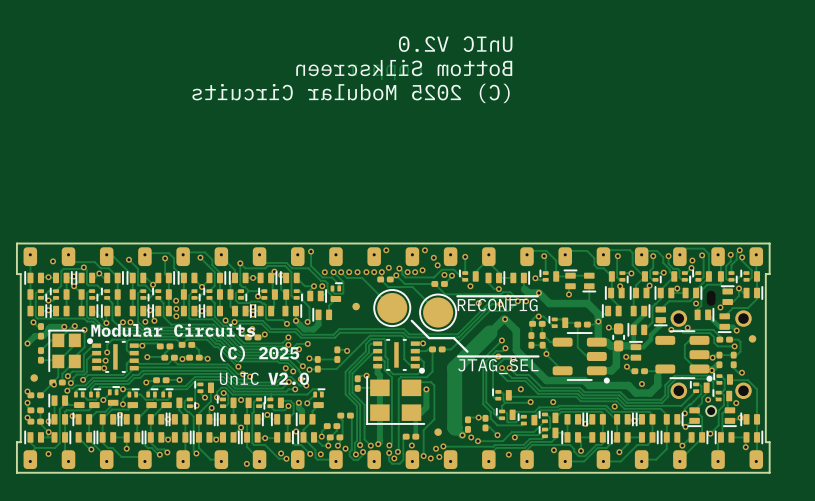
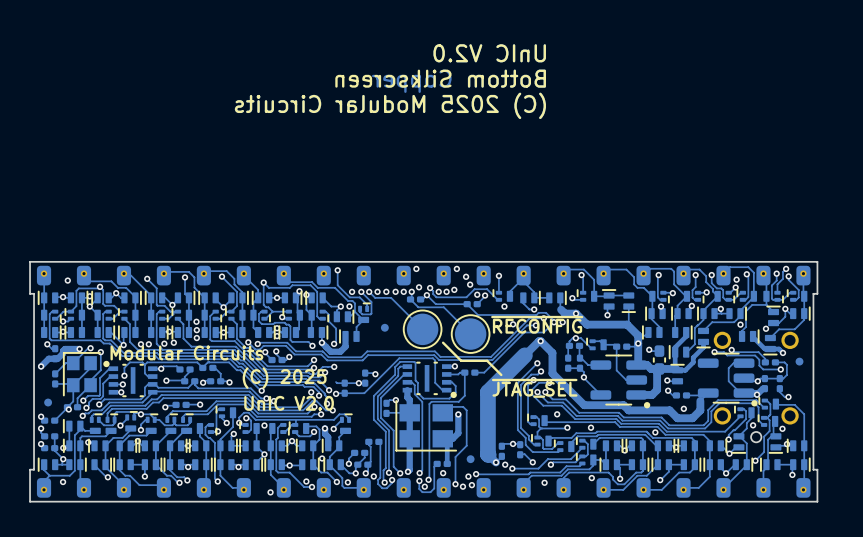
via position: (309, 358) -> (358, 383)

